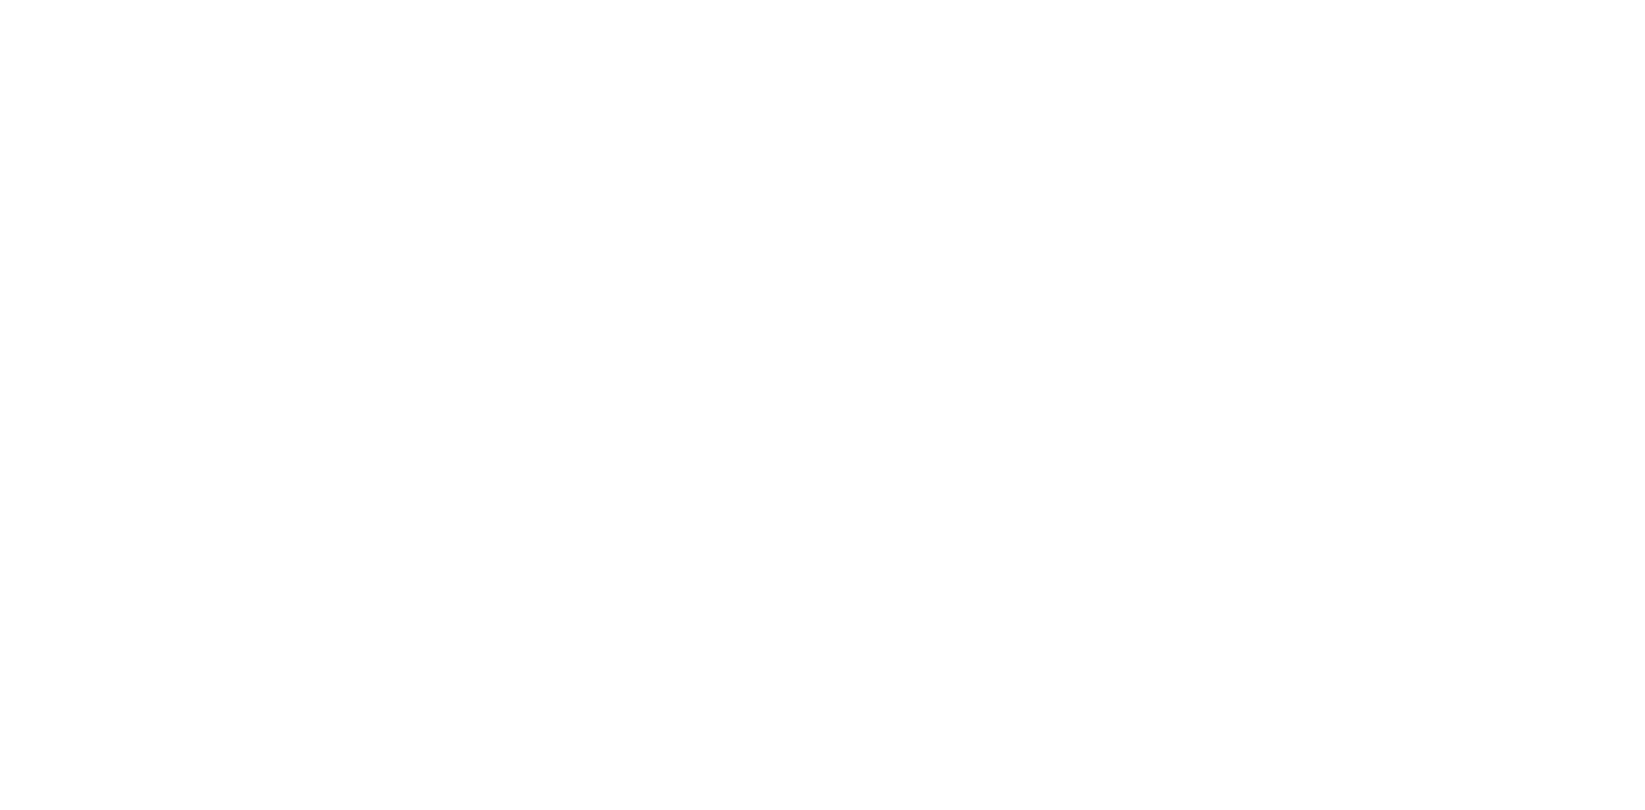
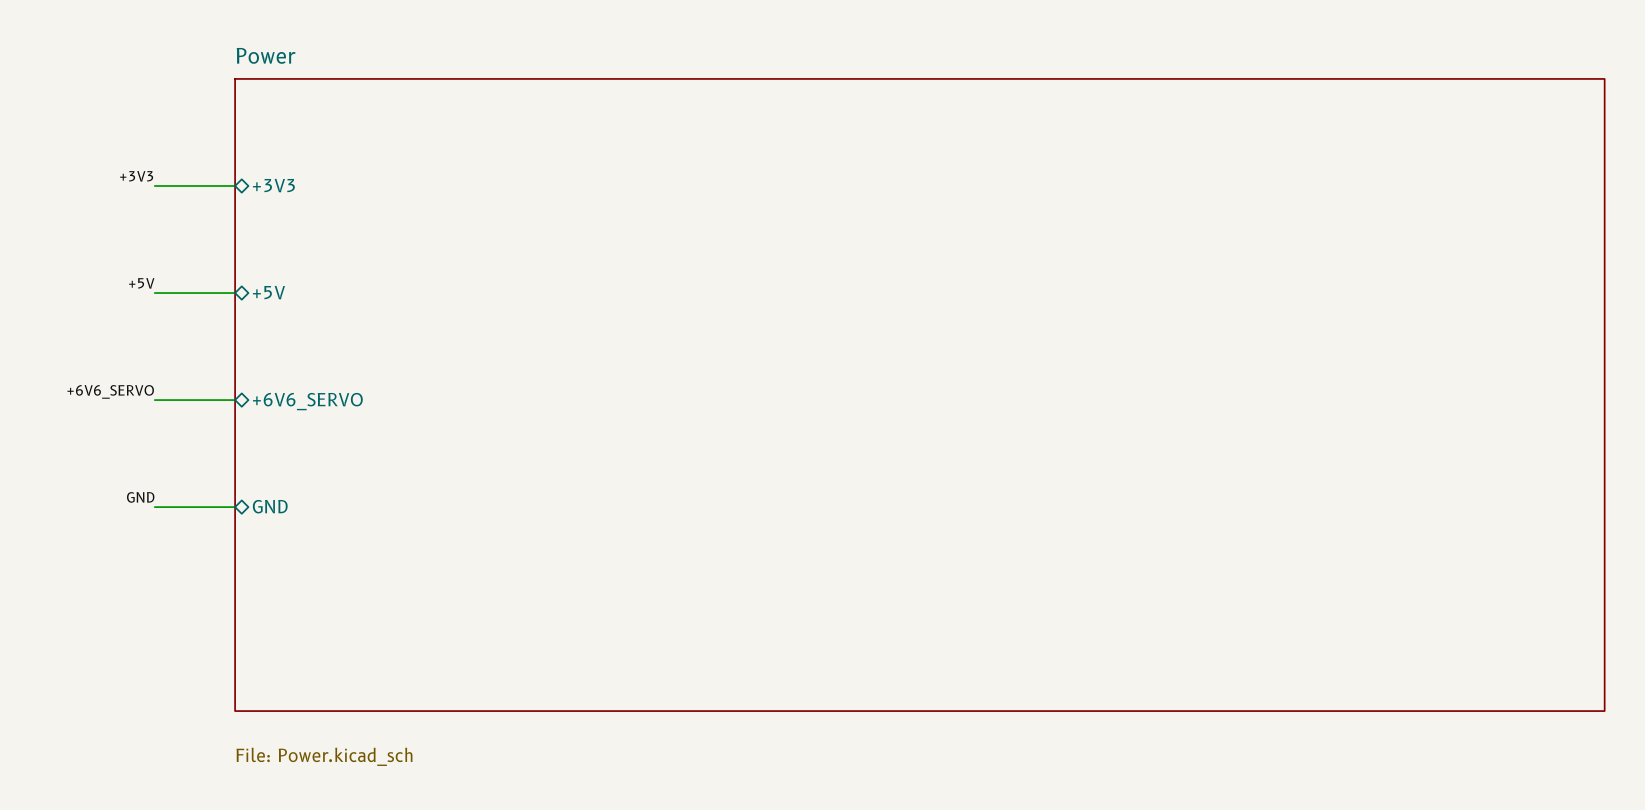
label: none -> +3V3 (136, 176)
wire: none -> (154, 185) (235, 185)
sheet pin: none -> +3V3 (273, 185)
label: none -> +5V (141, 283)
sheet pin: none -> +5V (268, 292)
wire: none -> (154, 293) (235, 293)
label: none -> +6V6_SERVO (110, 391)
sheet Power: none -> File: Power.kicad_sch (919, 395)
sheet pin: none -> +6V6_SERVO (307, 401)
wire: none -> (154, 400) (235, 400)
label: none -> GND (140, 497)
sheet pin: none -> GND (270, 506)
wire: none -> (154, 507) (235, 507)

